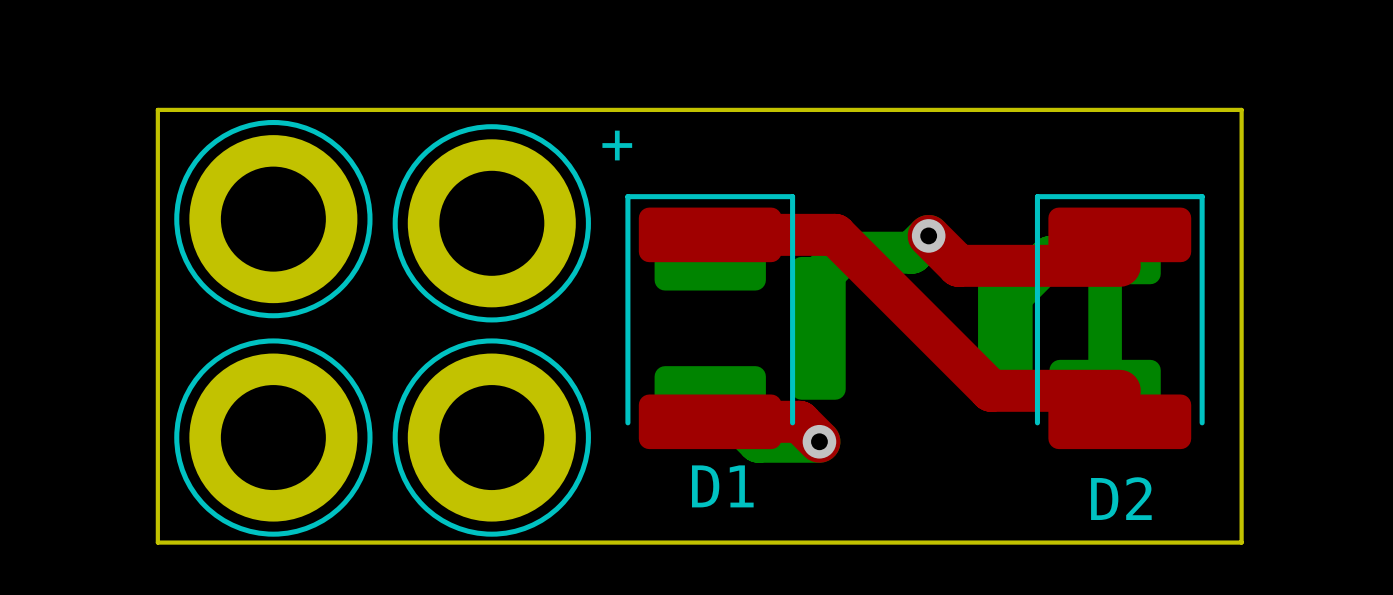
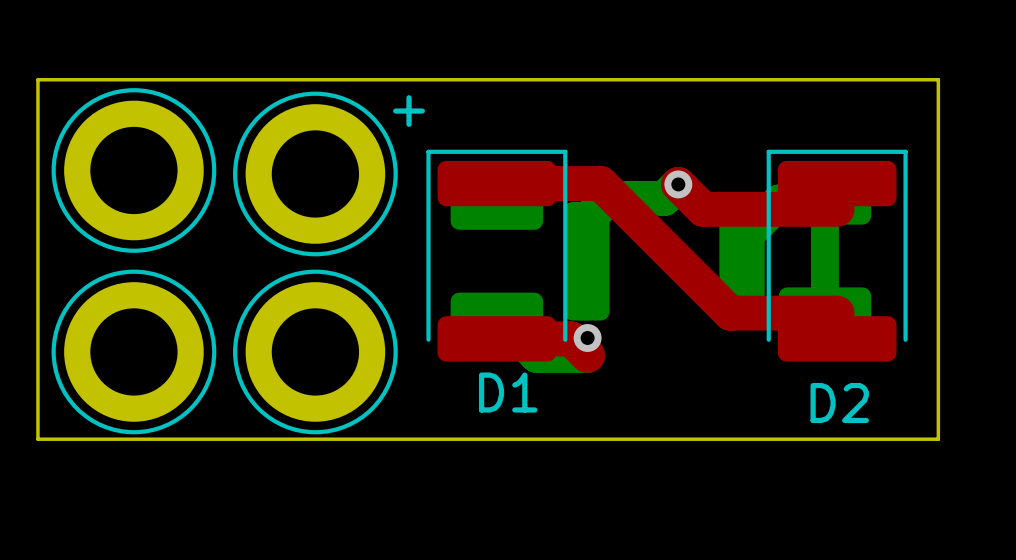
via position: (819, 441) -> (587, 338)

